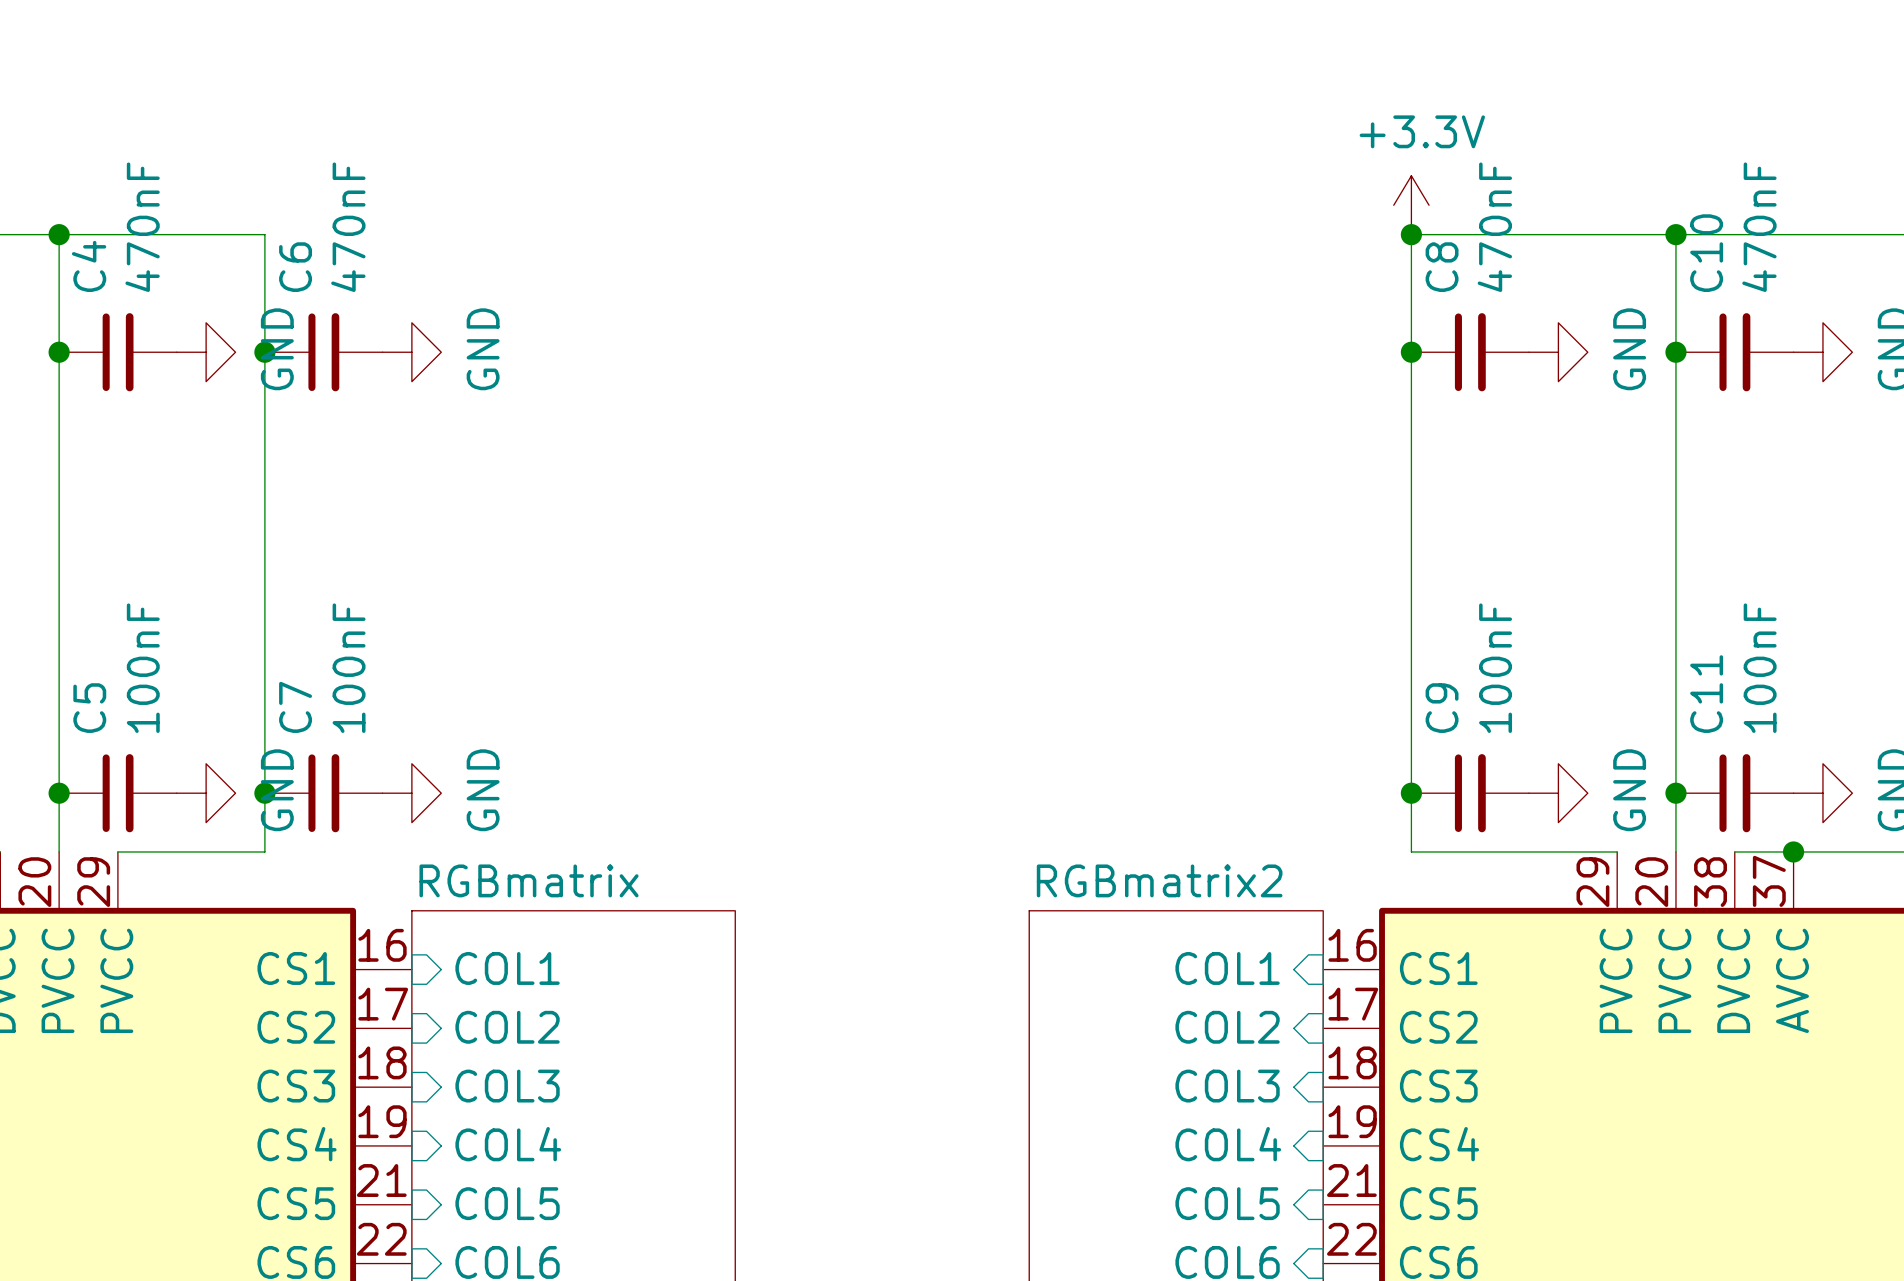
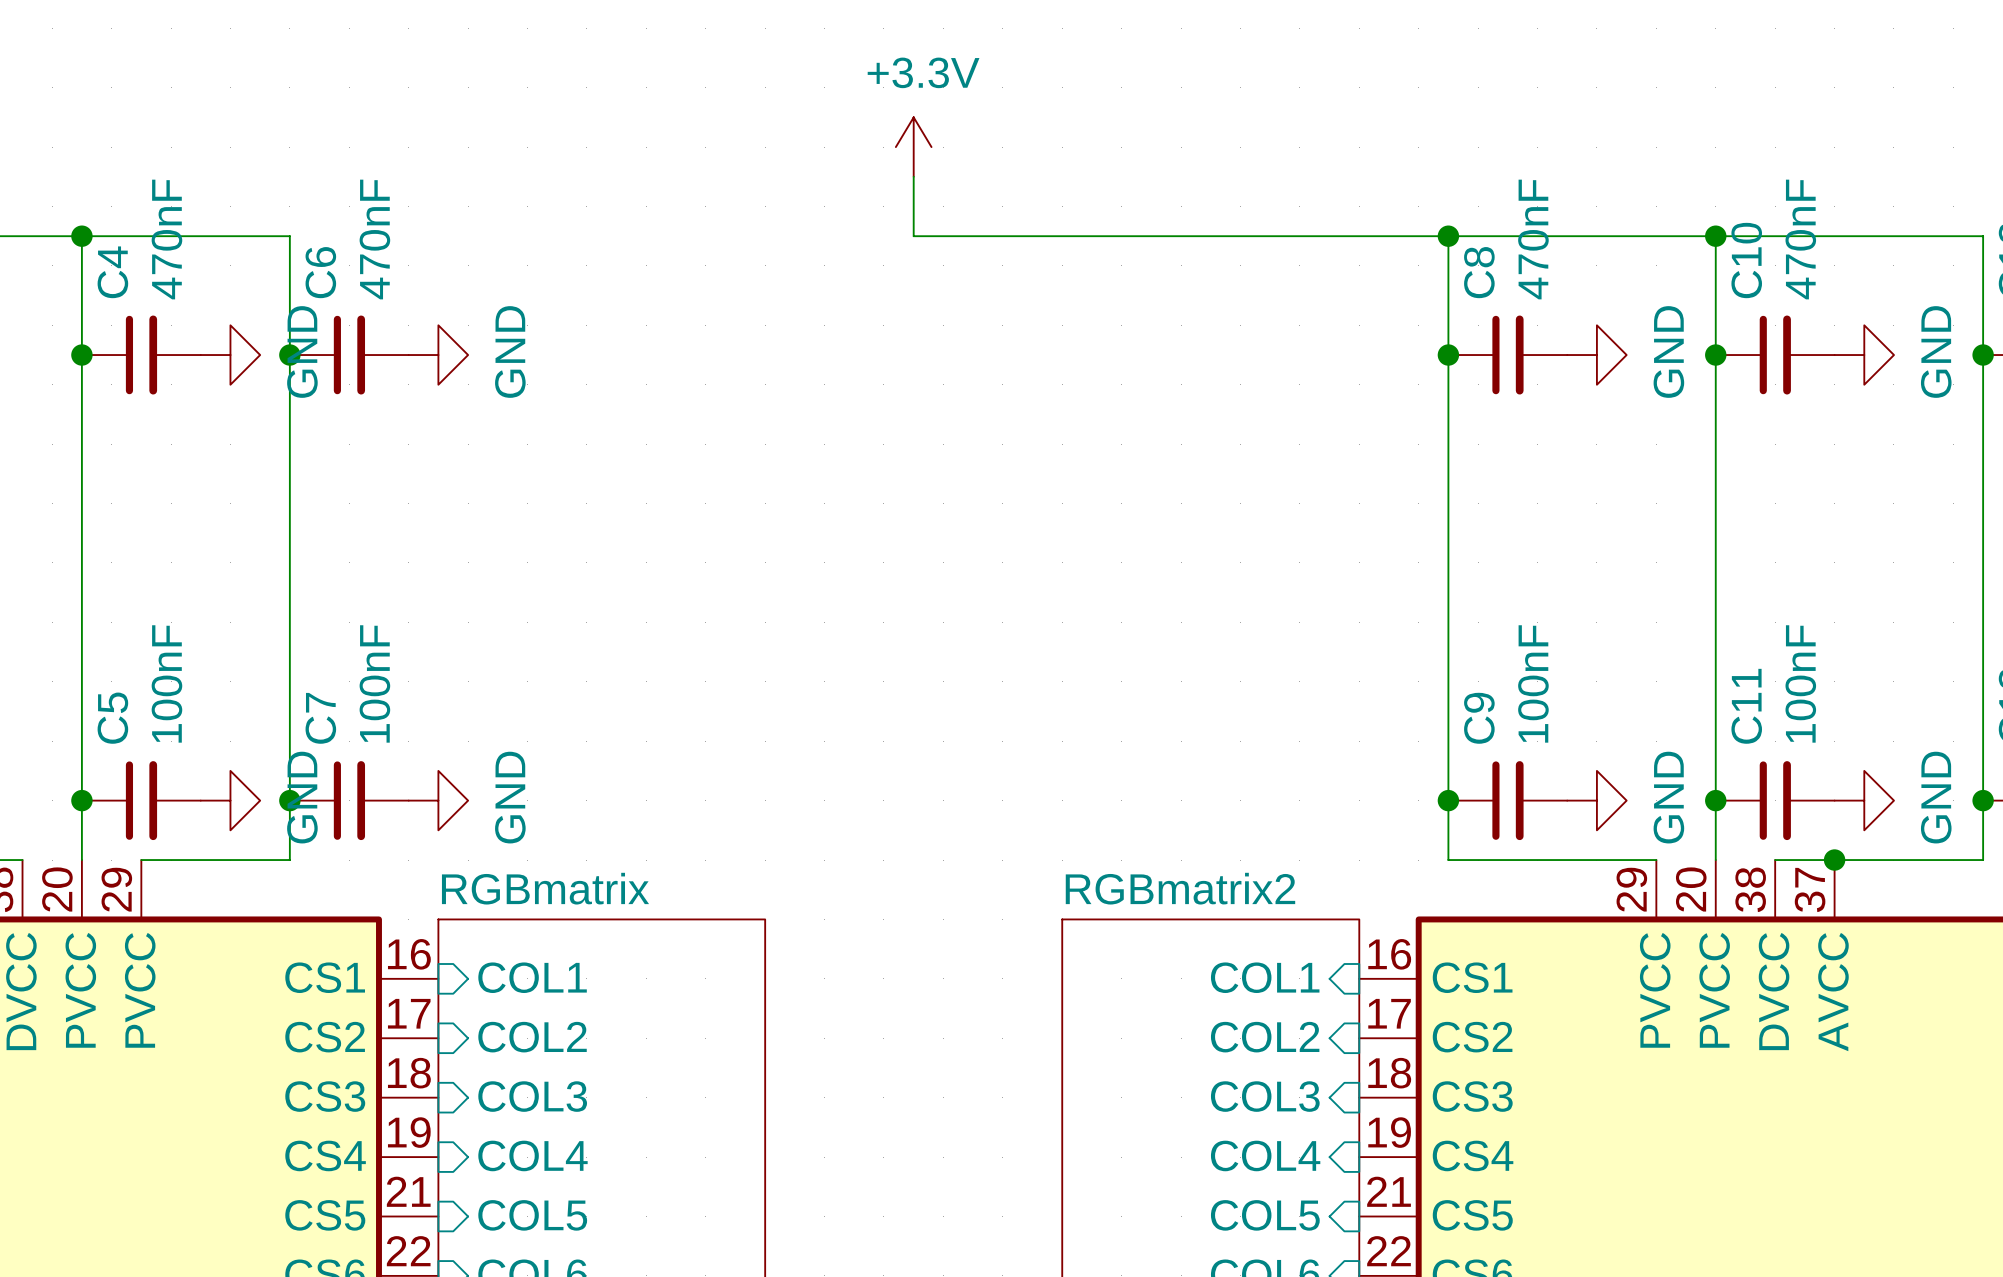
wire: none -> (913, 176) (913, 236) (1448, 236)
power symbol position: +3.3V (1411, 205) -> +3.3V (913, 147)

